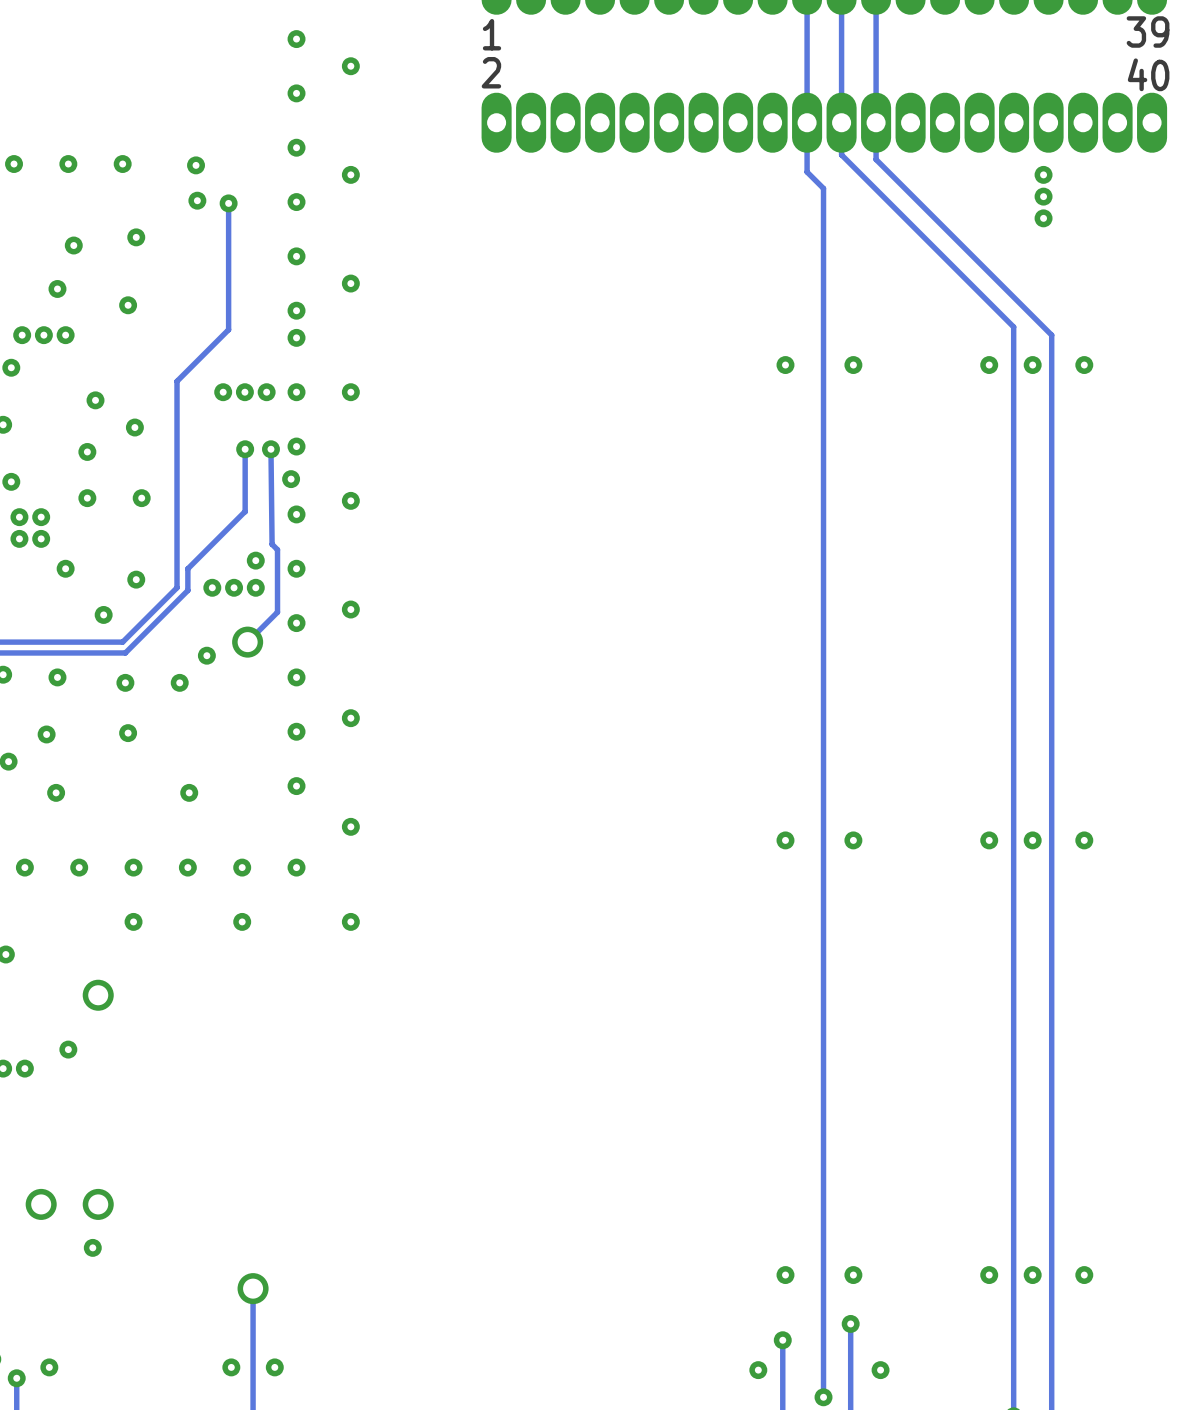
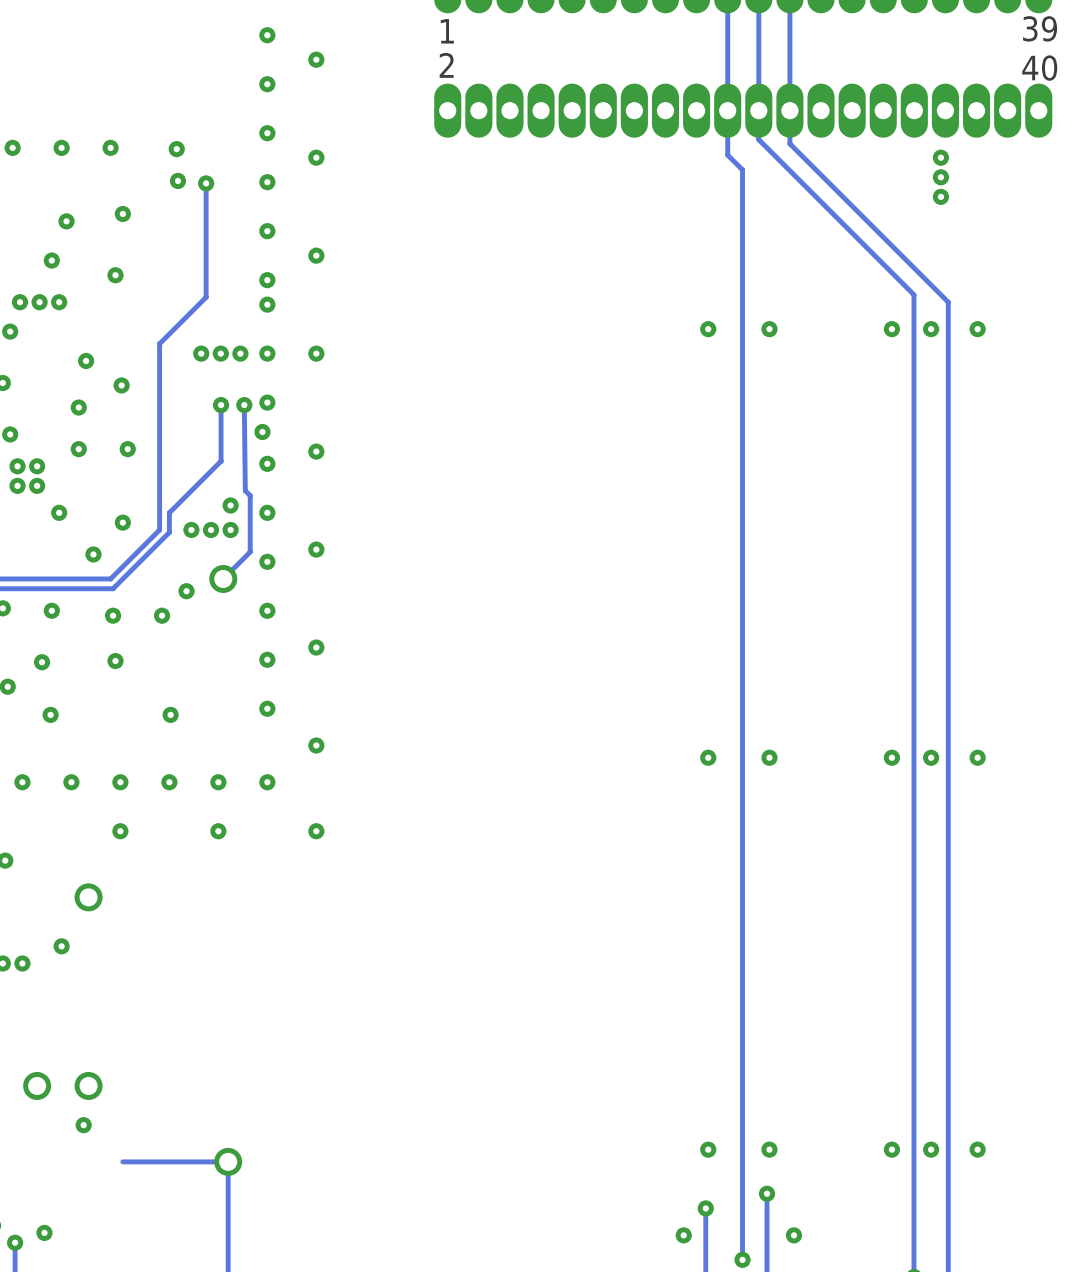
track: none -> (228, 1161) (122, 1161)
via: (231, 1367) -> none
via: (274, 1367) -> none

